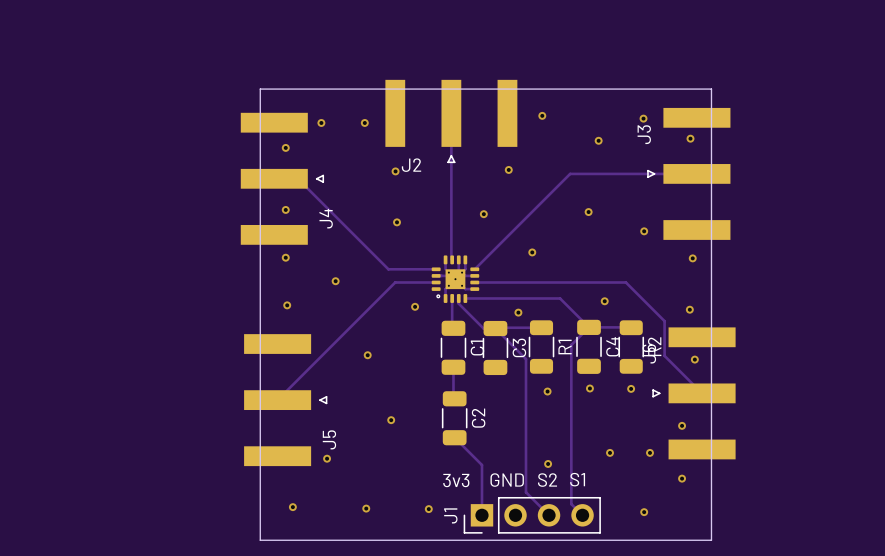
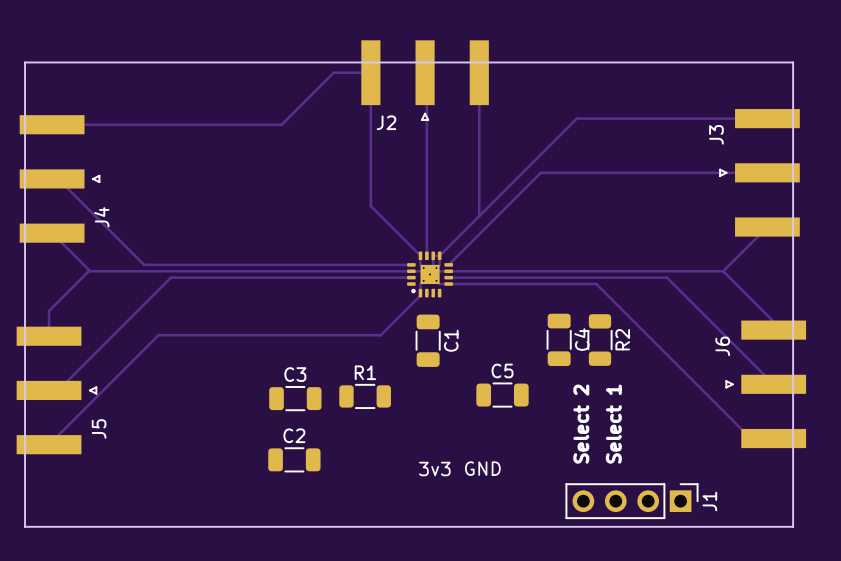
track: none -> (479, 72) (479, 216)
track: (451, 113) (452, 259) -> (425, 72) (426, 74) (426, 255)
via: (542, 115) -> none
track: none -> (767, 118) (576, 118) (439, 255) (433, 255)
via: (643, 118) -> none
J2 position: (451, 121) -> (425, 80)
via: (321, 122) -> none
via: (364, 122) -> none
track: none -> (52, 124) (282, 124)
track: none -> (281, 124) (333, 72) (370, 72) (370, 206) (420, 255)
via: (690, 138) -> none
via: (598, 140) -> none
via: (285, 147) -> none
via: (508, 169) -> none
via: (395, 171) -> none
track: (570, 173) (696, 173) -> (540, 172) (767, 172)
J3 position: (688, 173) -> (759, 172)
track: (274, 178) (297, 178) (388, 269) -> (58, 178) (144, 264) (365, 264)
J4 position: (282, 178) -> (59, 178)
via: (285, 209) -> none
via: (588, 212) -> none
via: (483, 214) -> none
via: (397, 222) -> none
track: none -> (767, 227) (723, 271)
via: (644, 231) -> none
track: none -> (52, 233) (89, 270) (49, 310) (49, 336)
via: (532, 252) -> none
via: (285, 257) -> none
via: (692, 258) -> none
track: none -> (88, 271) (411, 271)
track: none -> (448, 271) (723, 271)
track: none -> (723, 271) (773, 321) (773, 330)
via: (335, 281) -> none
track: (395, 282) (277, 400) -> (371, 277) (170, 277) (58, 390)
track: (625, 282) (664, 321) (664, 355) (702, 393) -> (594, 277) (666, 277) (773, 384)
track: none -> (448, 284) (596, 284) (750, 438) (773, 438)
track: (452, 298) (453, 328) -> none
track: (458, 298) (458, 303) (483, 328) (541, 327) -> none
track: (465, 298) (560, 298) (589, 327) -> none
track: none -> (420, 295) (380, 335) (158, 335) (49, 444)
via: (604, 301) -> none
via: (287, 305) -> none
via: (415, 306) -> none
via: (689, 309) -> none
via: (518, 312) -> none
track: (589, 327) (631, 327) -> none
track: (589, 327) (571, 345) (571, 504) (582, 515) (589, 508) -> none
track: (495, 328) (526, 359) (526, 492) (549, 515) -> none
C3 rotation: 0° (495, 347) -> 90° clockwise (295, 398)
C3 position: (495, 347) -> (295, 398)
C3 name position: C3 (519, 347) -> C3 (295, 374)
R1 rotation: 0° (541, 347) -> 90° clockwise (365, 396)
R1 position: (541, 347) -> (365, 396)
R1 name position: R1 (565, 347) -> R1 (365, 372)
via: (367, 355) -> none
via: (694, 359) -> none
track: (453, 367) (454, 398) -> none
via: (589, 388) -> none
via: (631, 388) -> none
via: (547, 391) -> none
J6 position: (693, 393) -> (765, 384)
J5 position: (285, 400) -> (56, 390)
C5: none -> (502, 395)
C2 rotation: 0° (454, 418) -> 90° clockwise (294, 459)
C2 position: (454, 418) -> (294, 459)
C2 name position: C2 (478, 418) -> C2 (294, 435)
via: (391, 420) -> none
via: (682, 425) -> none
track: (454, 437) (481, 465) (481, 515) -> none
text: none -> Select 2 (581, 424)
text: none -> Select 1 (613, 424)
via: (610, 452) -> none
via: (649, 452) -> none
via: (327, 458) -> none
via: (548, 463) -> none
via: (682, 478) -> none
text: S1 (577, 479) -> none
text: S2 (547, 480) -> none
via: (292, 507) -> none
via: (366, 508) -> none
via: (428, 509) -> none
via: (644, 512) -> none
J1 rotation: 0° (532, 515) -> 180° (631, 501)
J1 position: (532, 515) -> (631, 501)
board edge: (260, 540) (260, 89) (711, 89) (711, 540) -> (241, 526) (25, 526) (25, 62) (793, 62) (793, 526) (677, 526)

